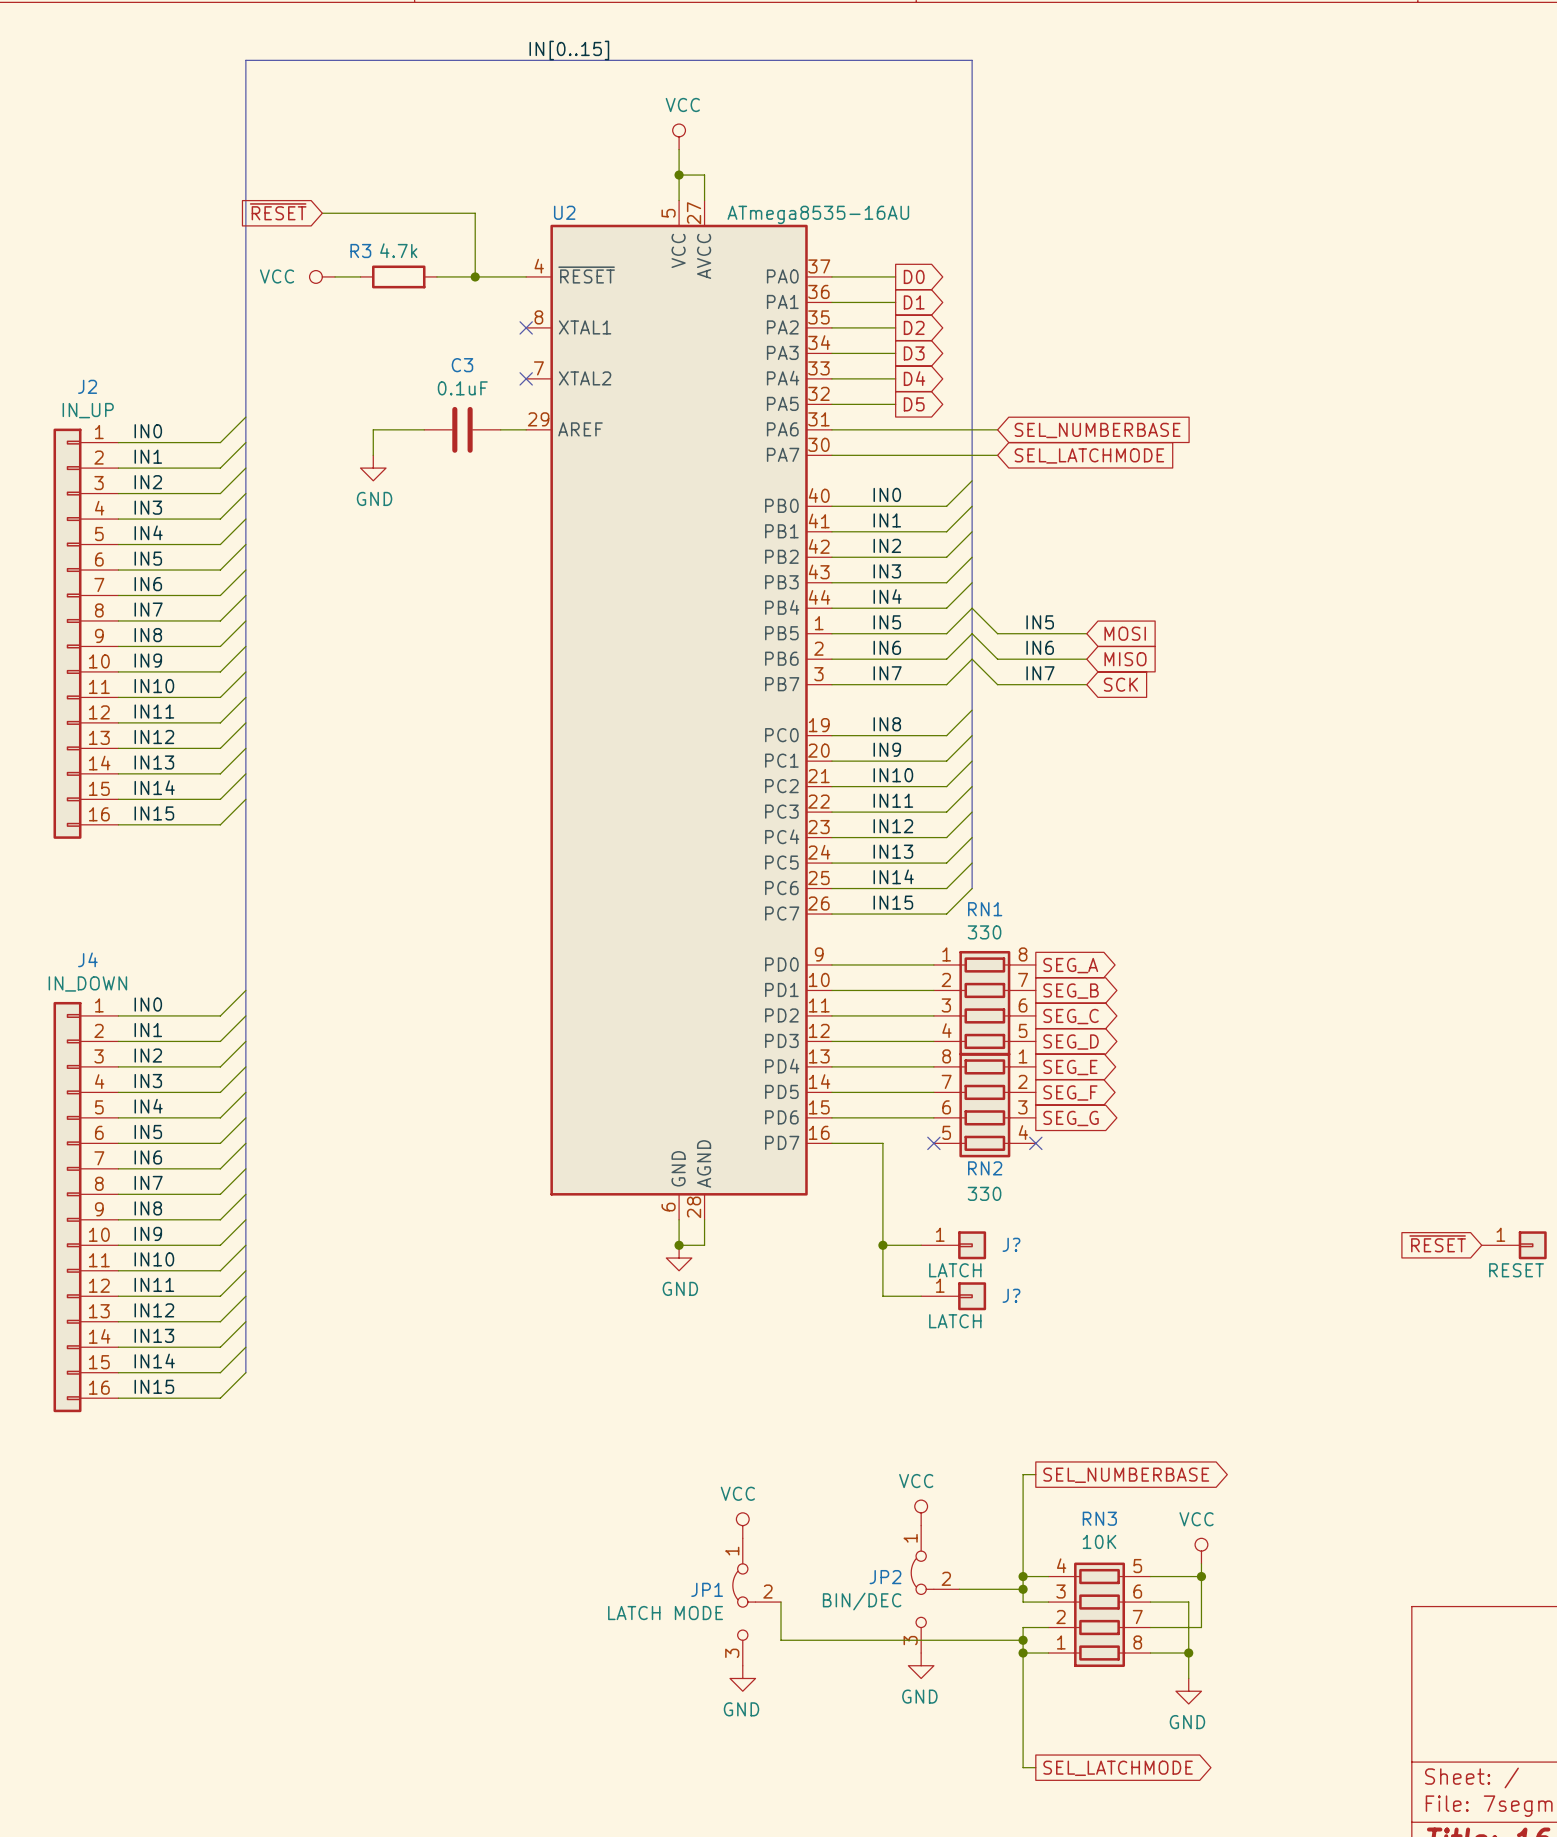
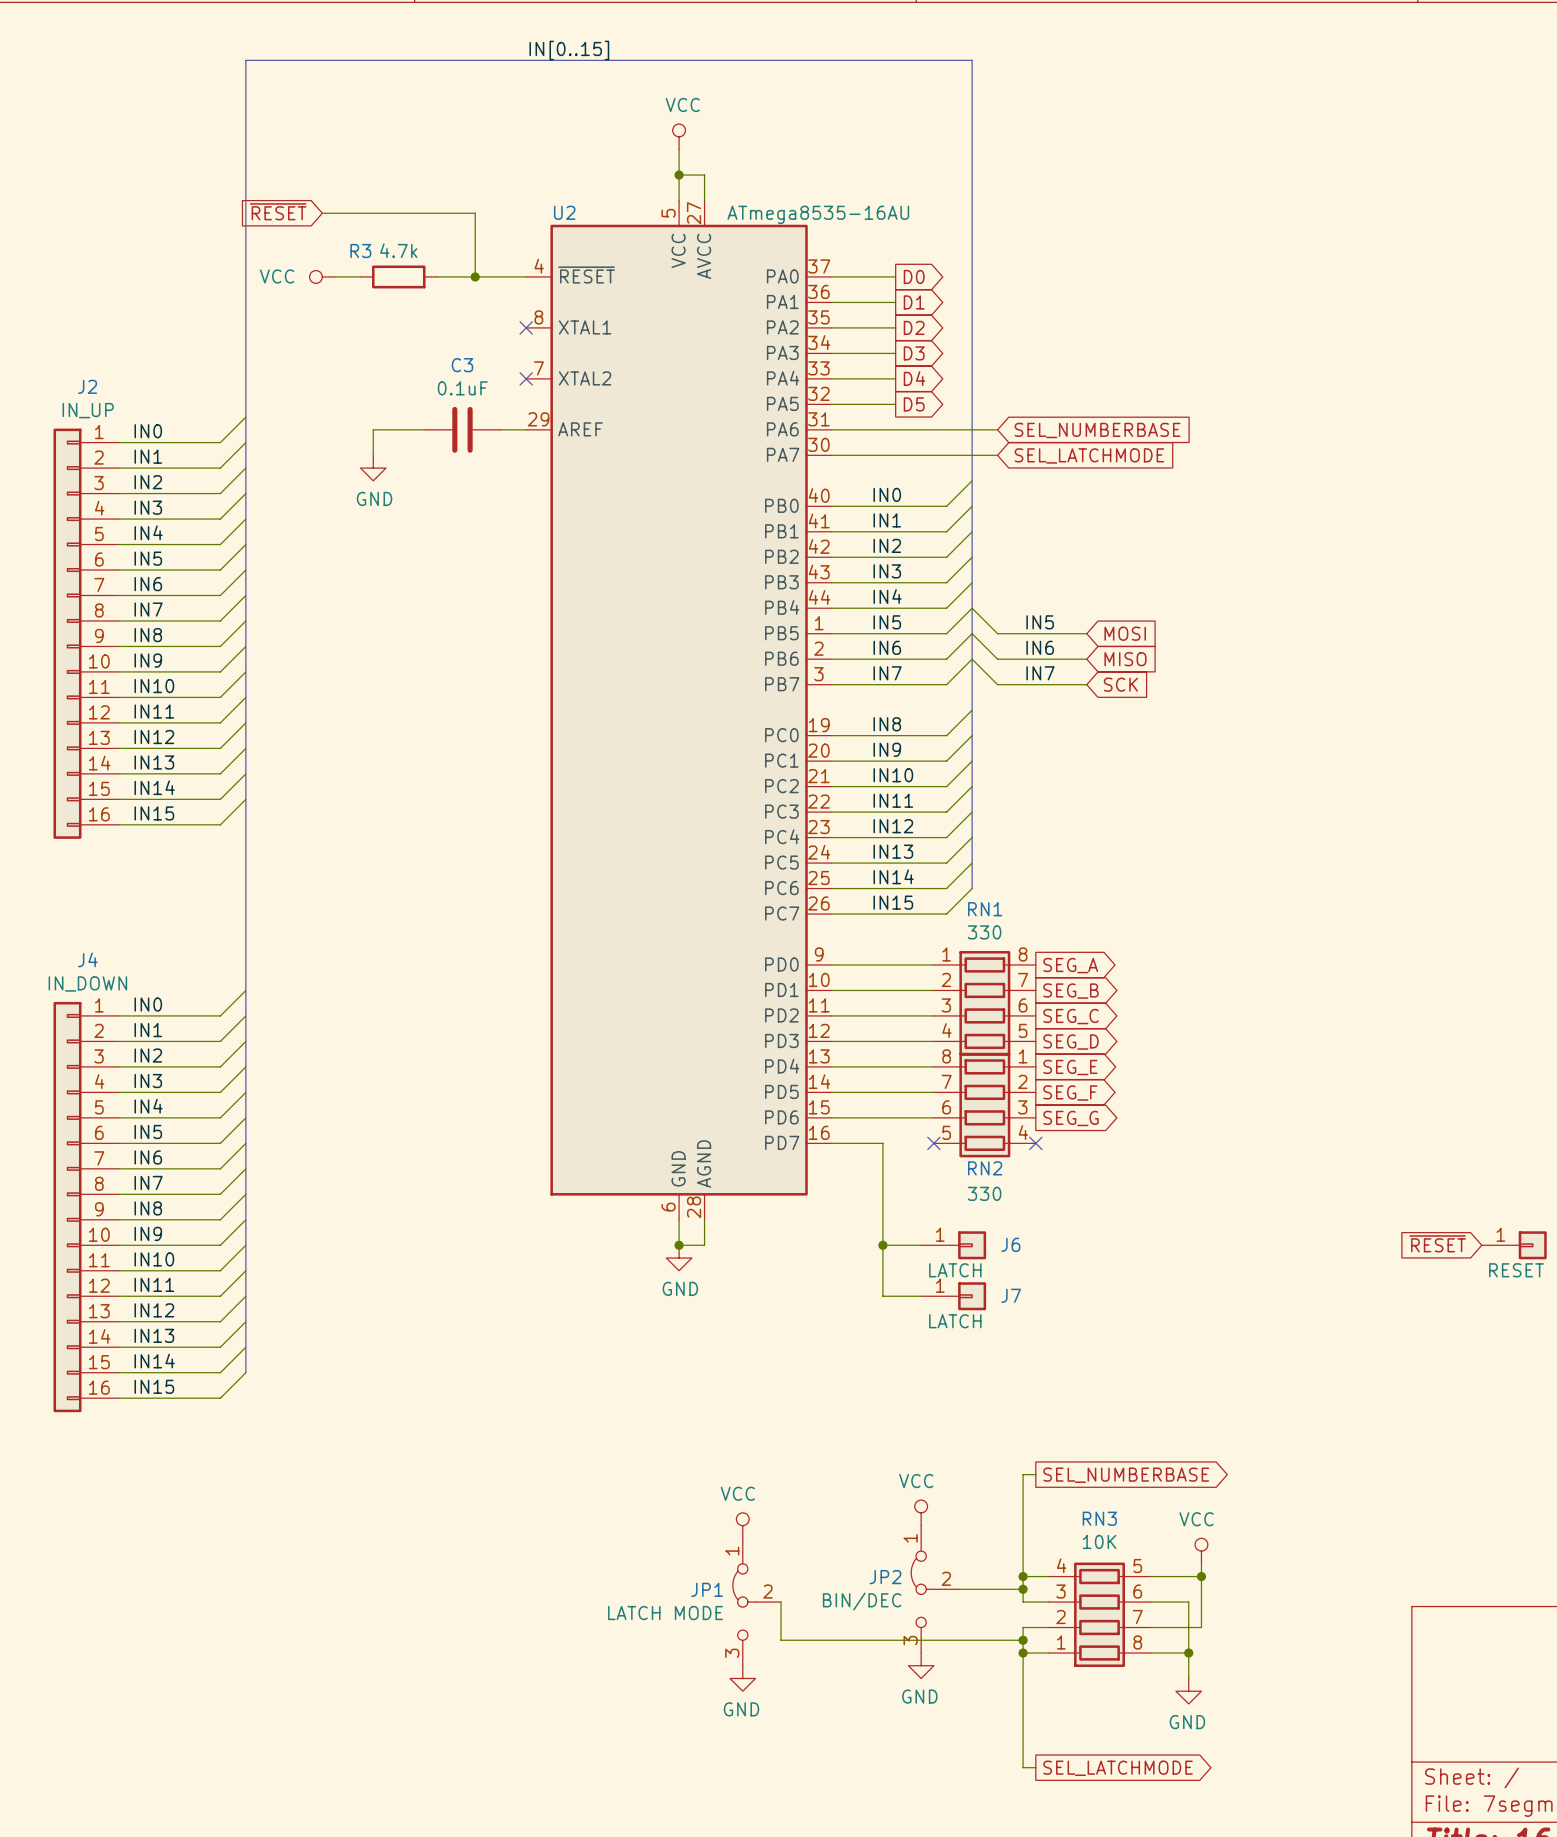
J? name: J? (1011, 1244) -> J6 (1010, 1244)
J? name: J? (1011, 1295) -> J7 (1011, 1295)

